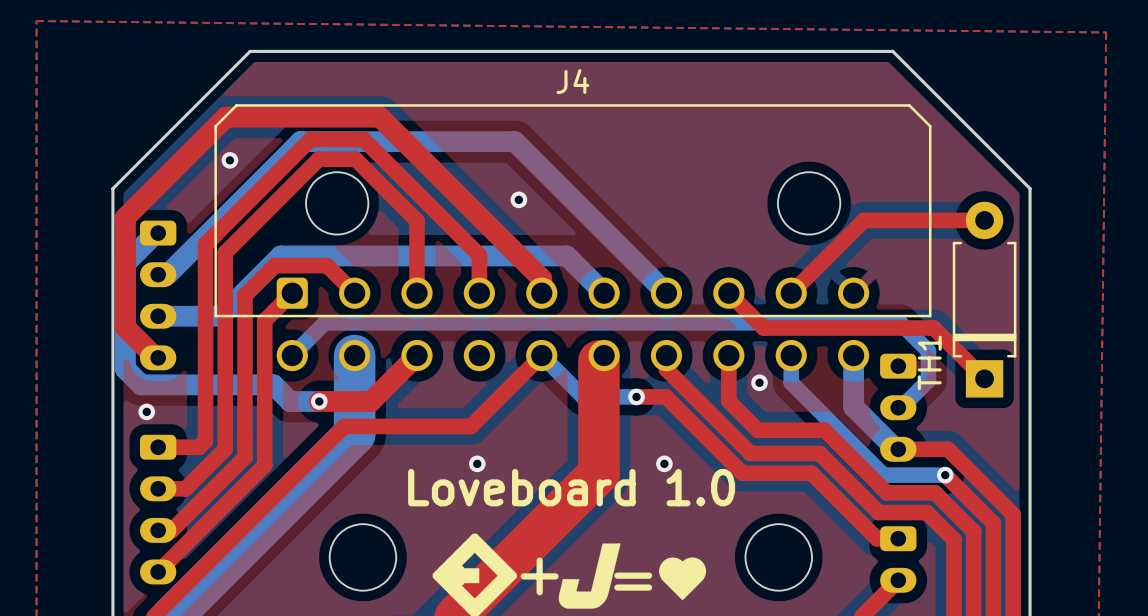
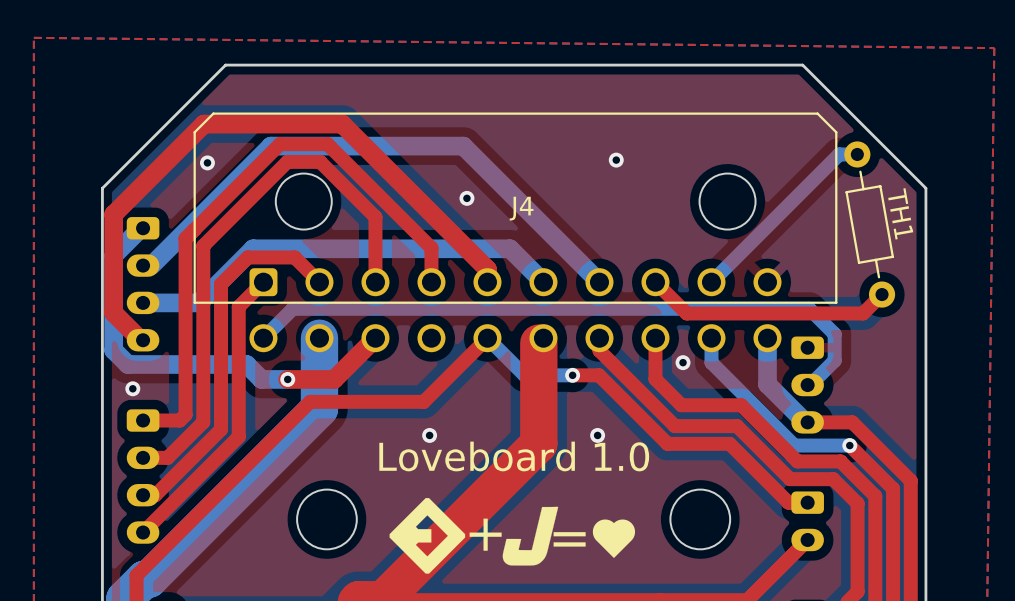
J4 name position: J4 (572, 81) -> J4 (521, 208)
bottom track: none -> (857, 154) (839, 154) (711, 282)
via: none -> (616, 160)
TH1 footprint: [952, 201, 1017, 398] -> [844, 141, 896, 308]
top track: (984, 220) (863, 220) (791, 293) -> none
top track: (933, 328) (984, 378) -> (839, 313) (863, 313) (882, 294)
TH1 name position: TH1 (929, 362) -> TH1 (900, 213)

